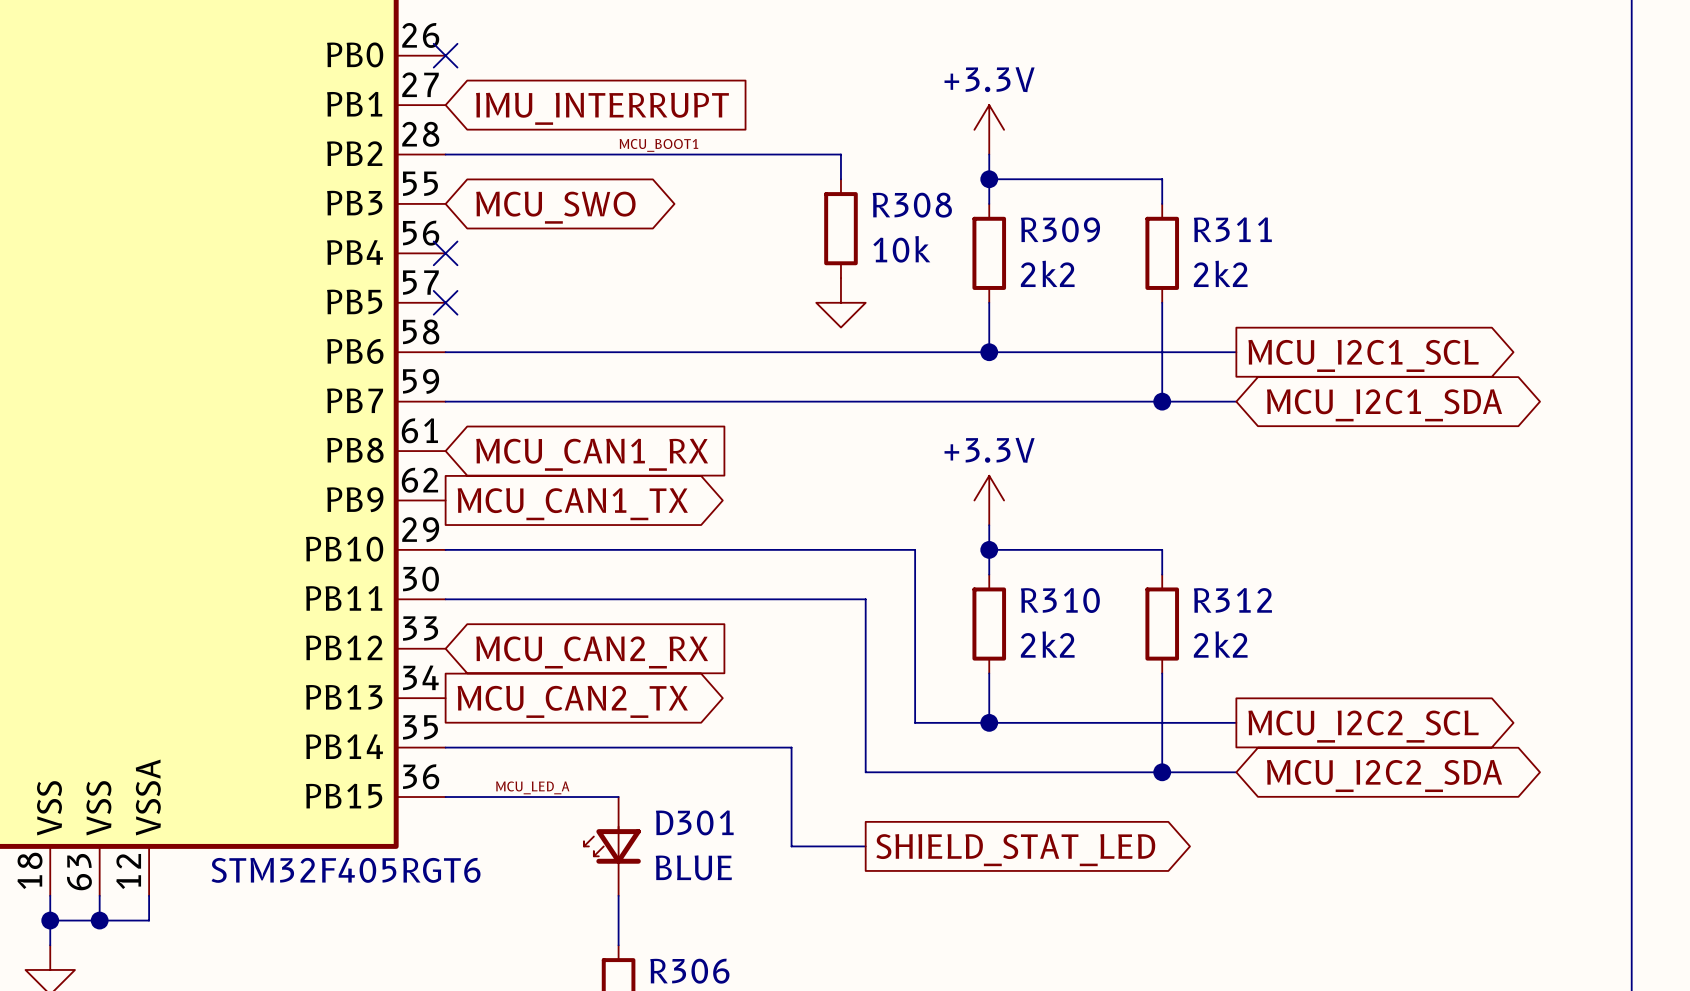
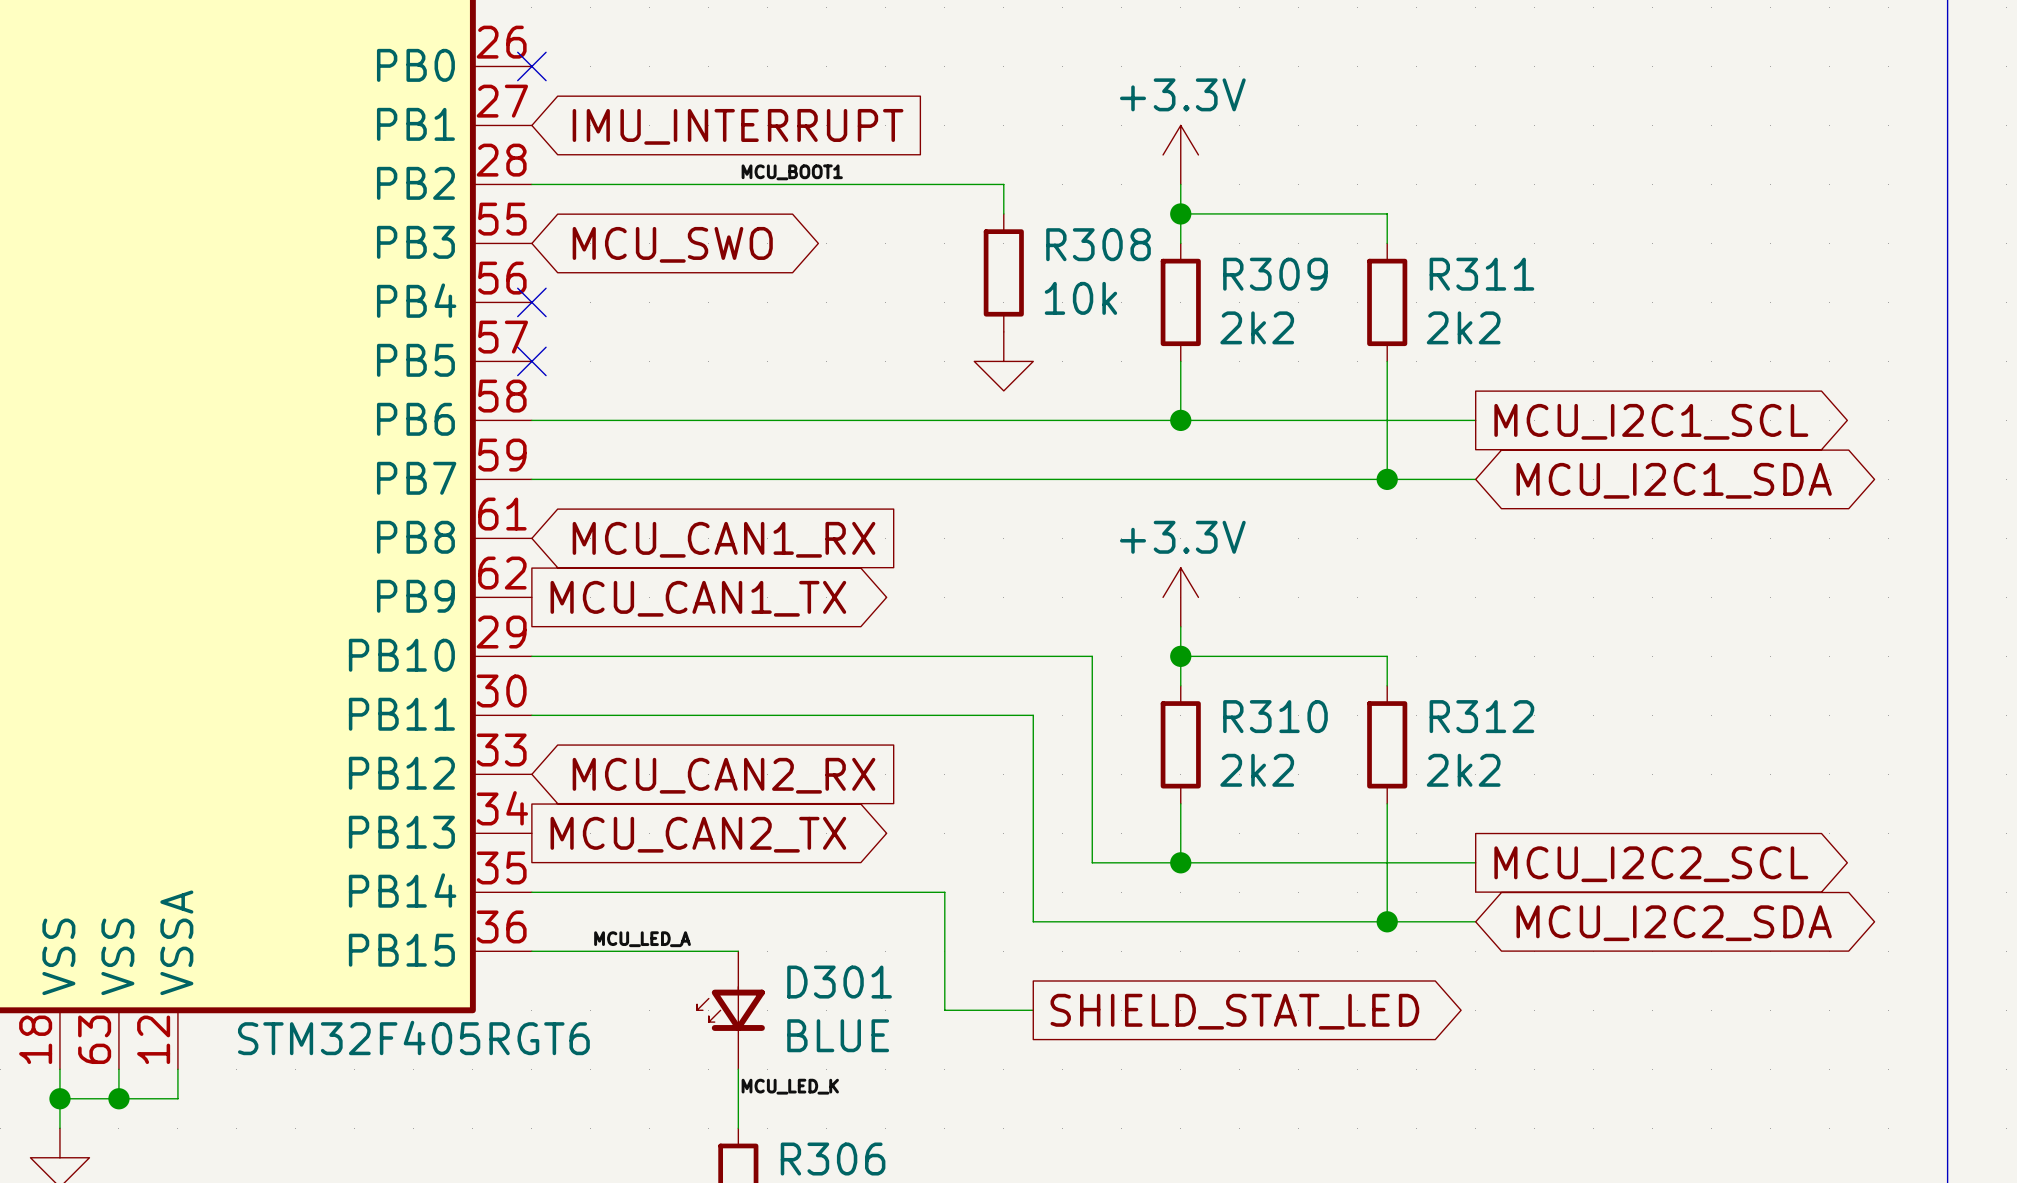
label: none -> MCU_LED_K (790, 1086)

